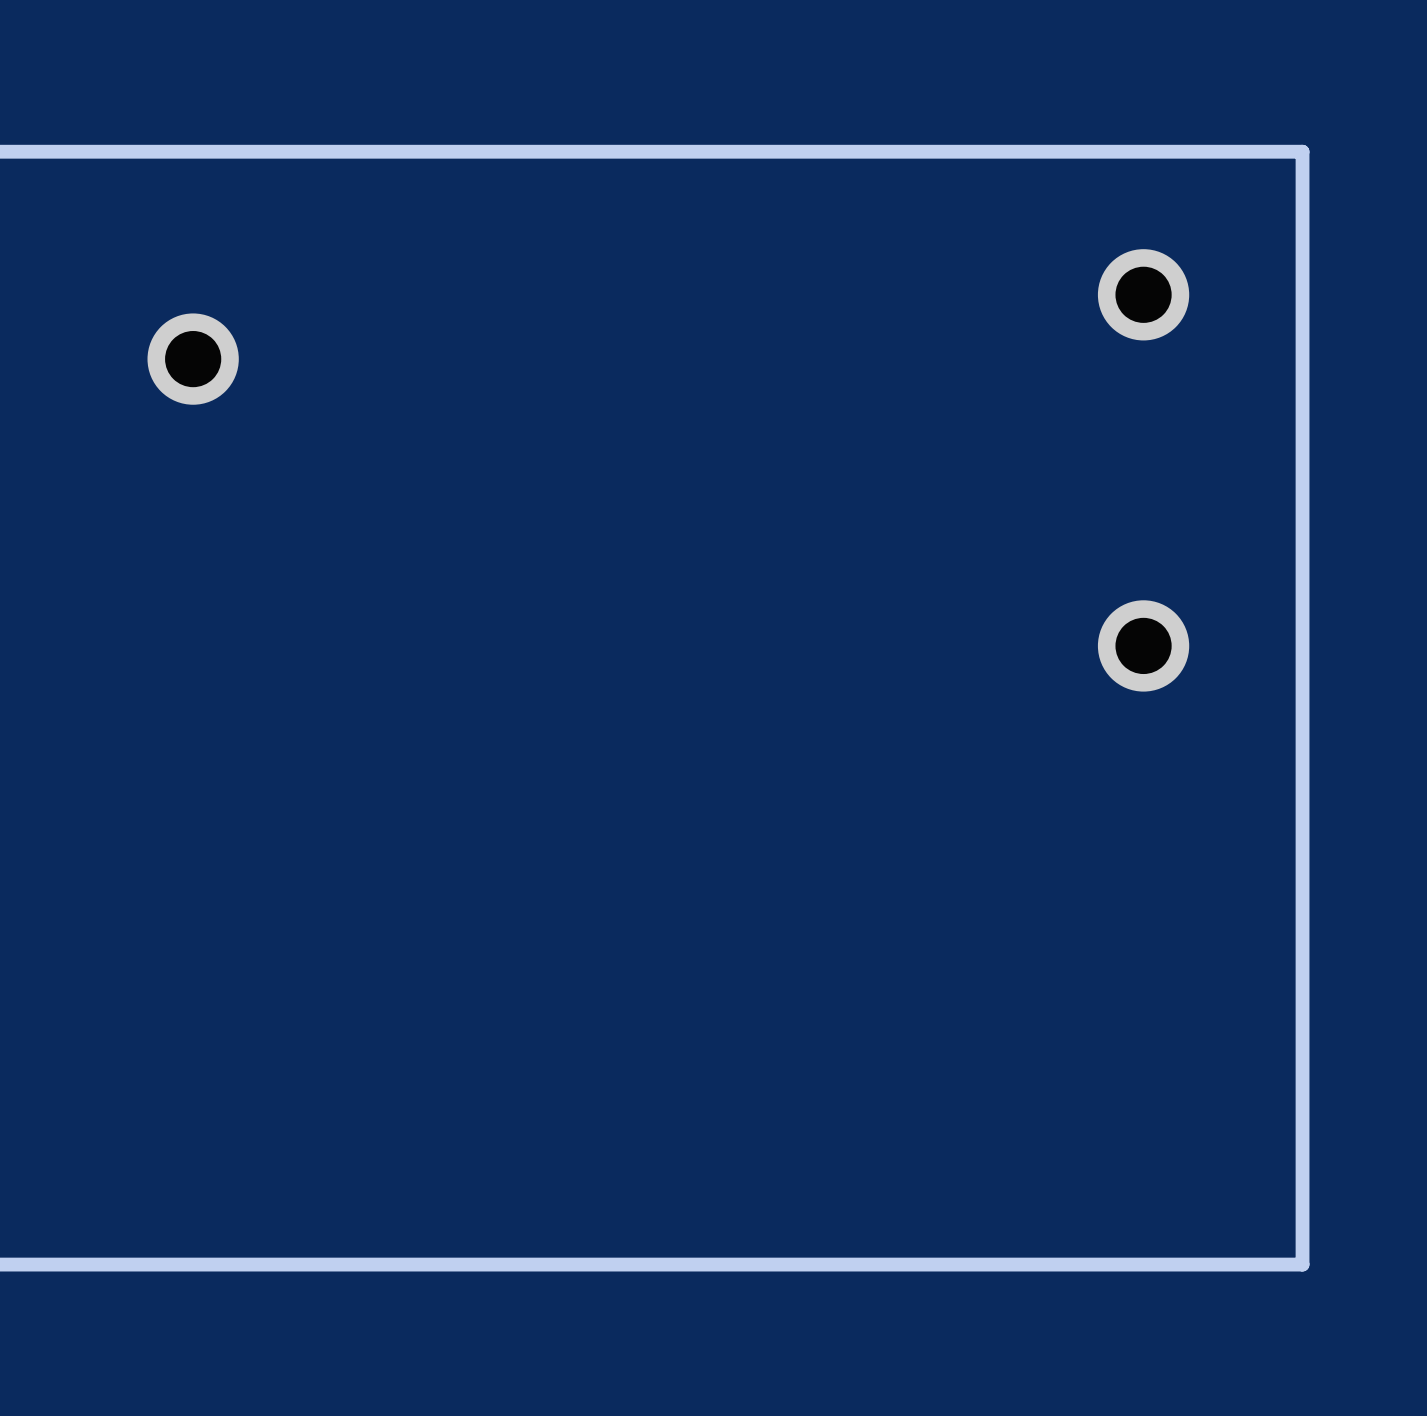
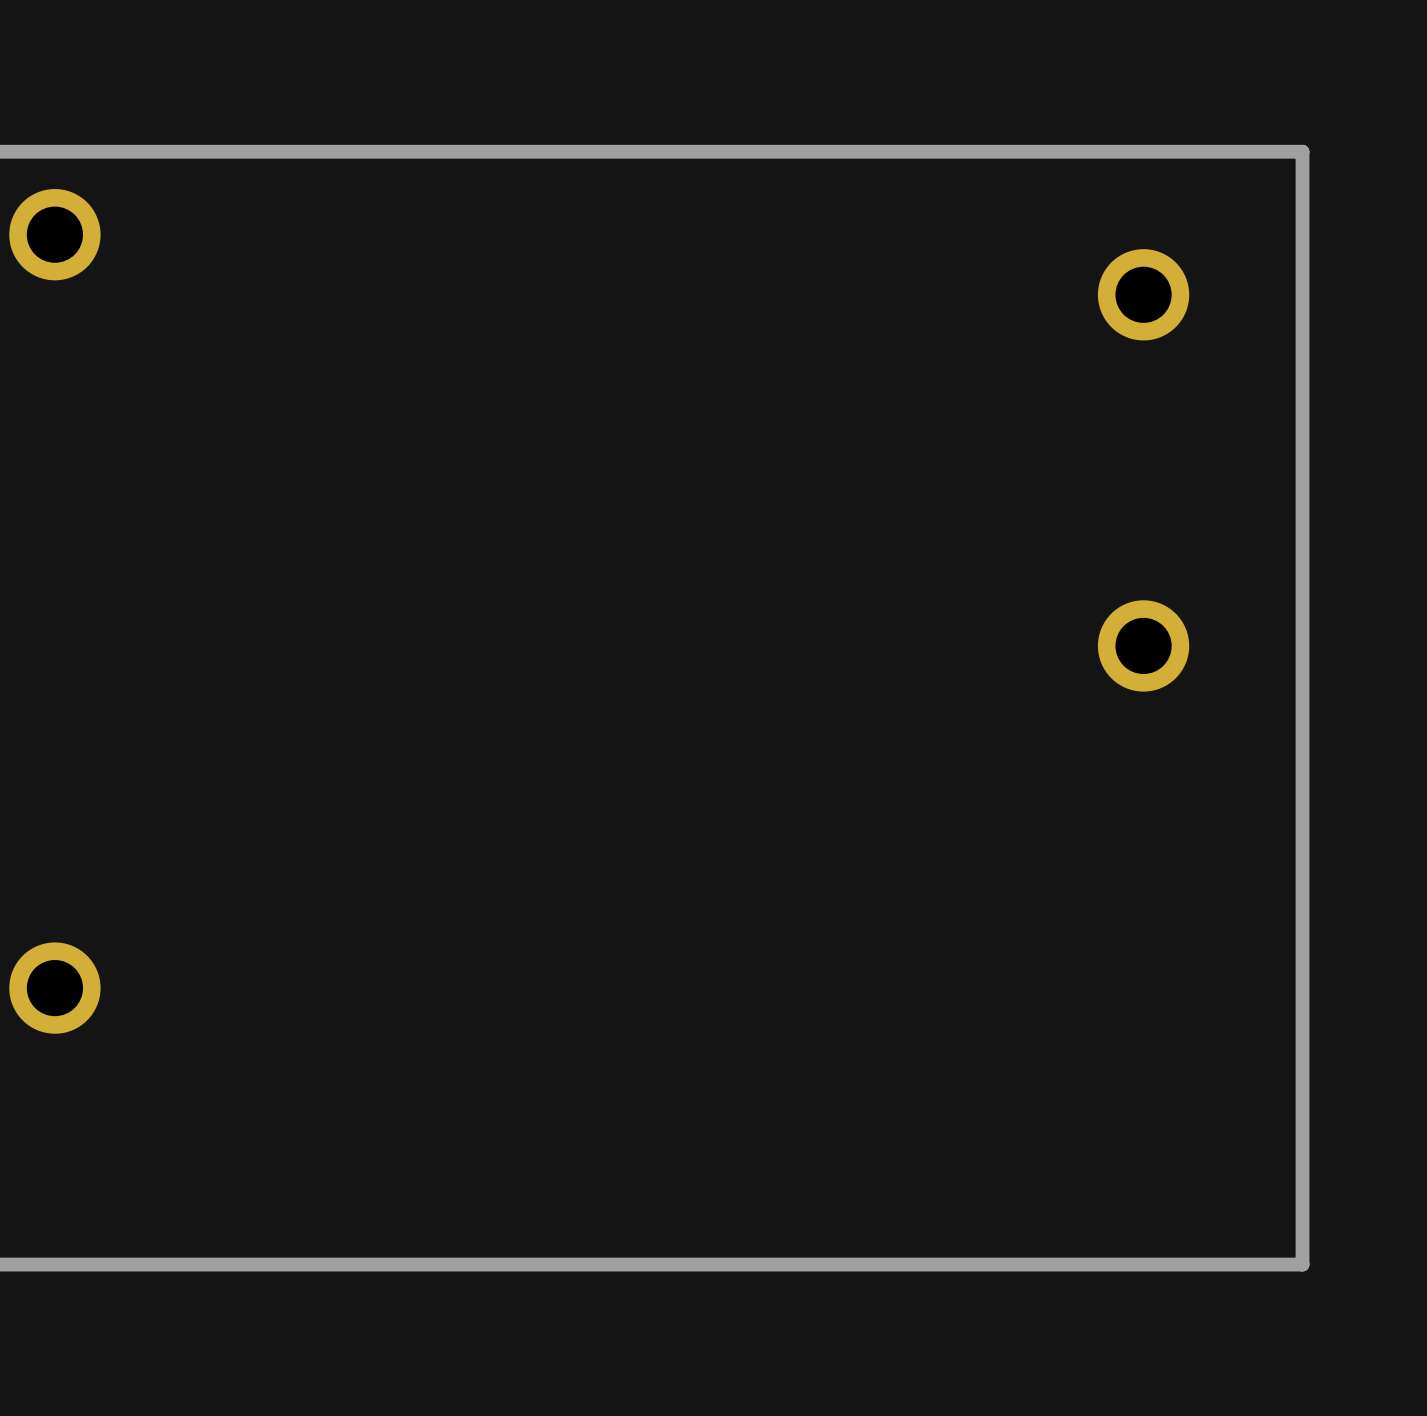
part position: (193, 359) -> (54, 234)
part: none -> (54, 988)

